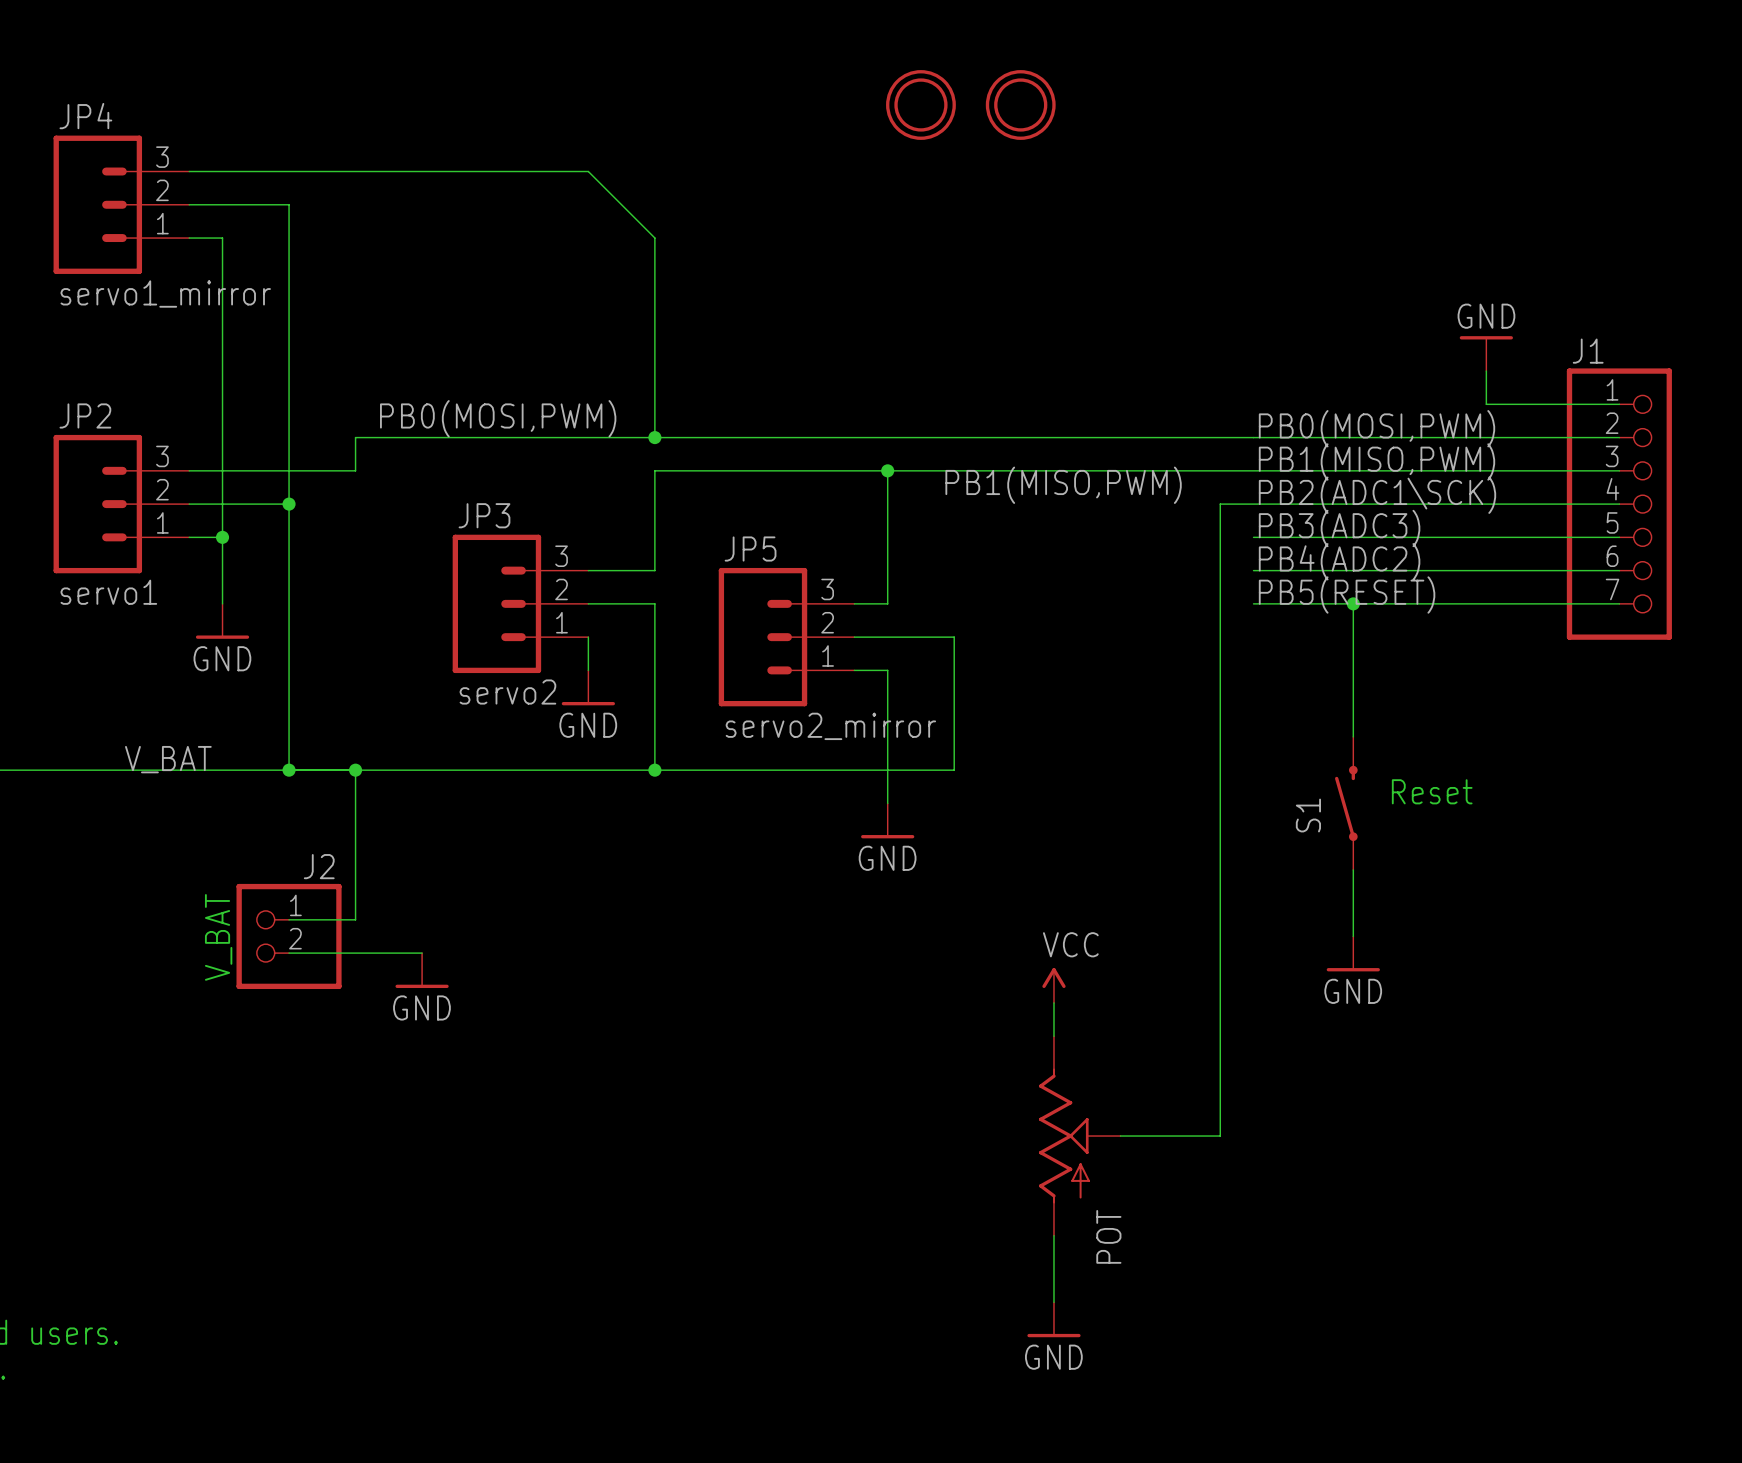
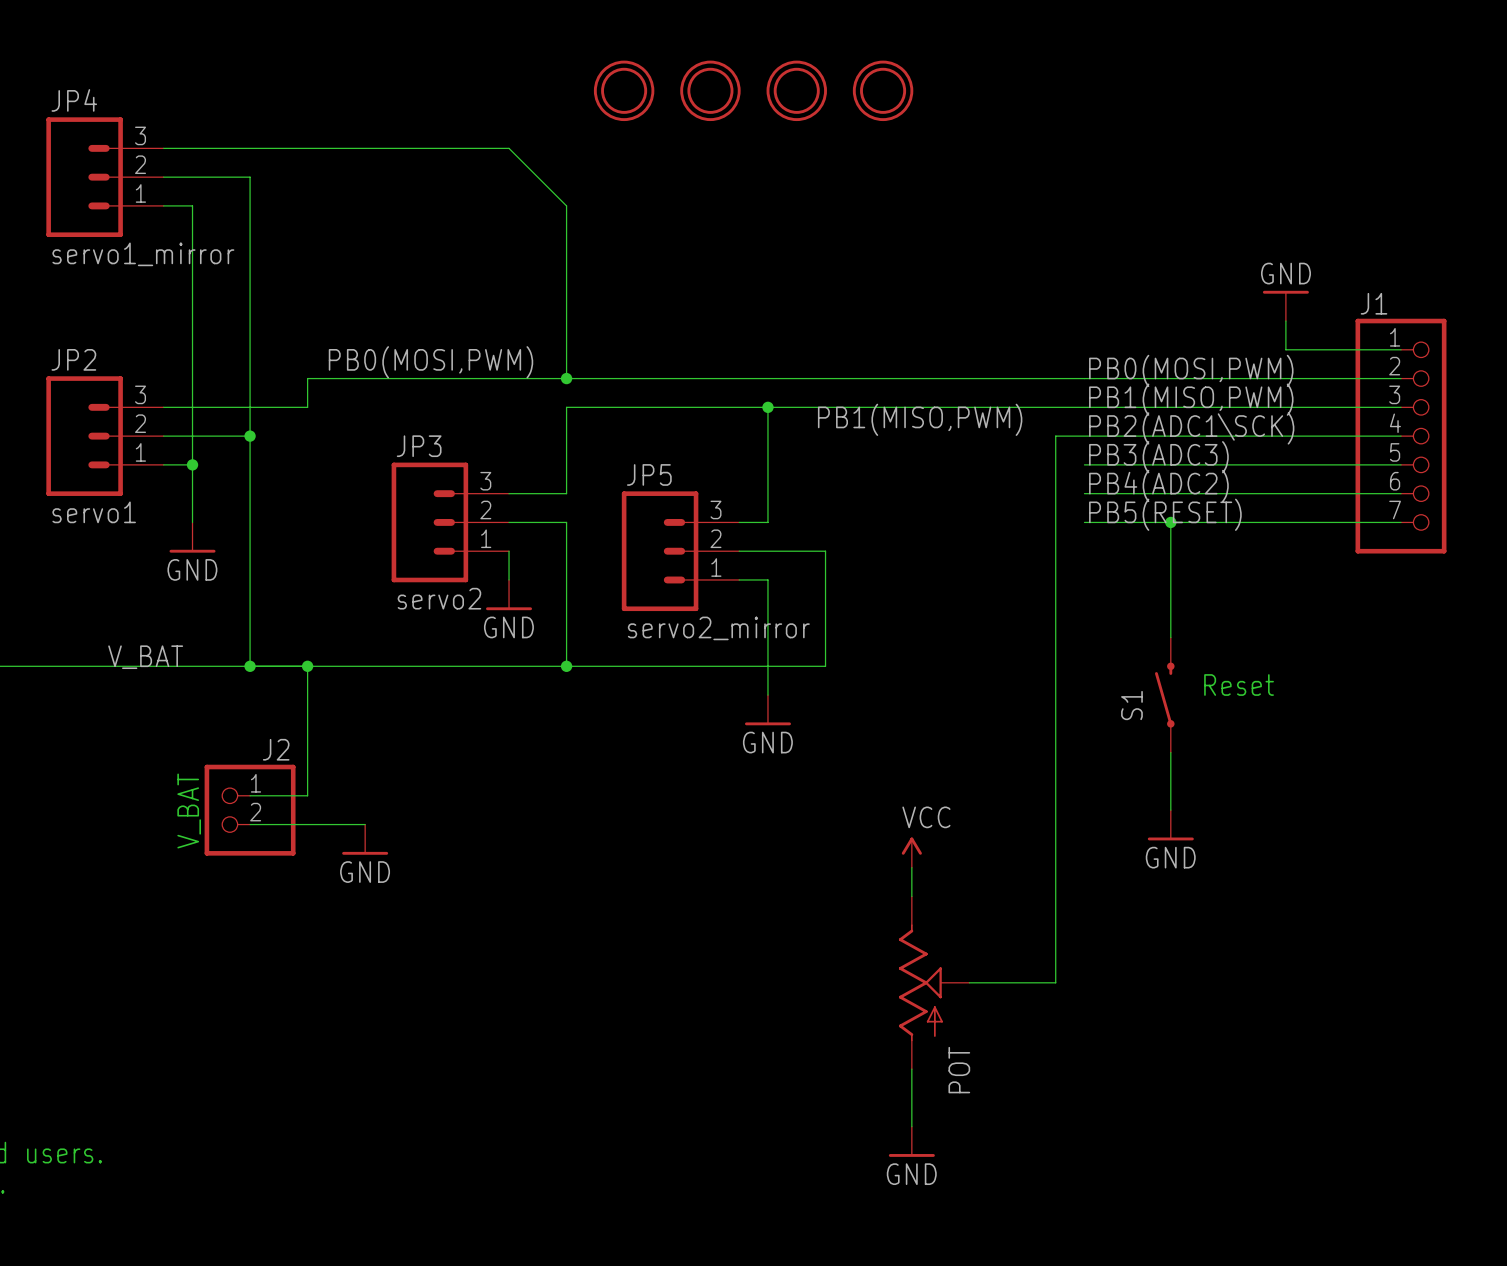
part: none -> (624, 90)
part: none -> (710, 90)

